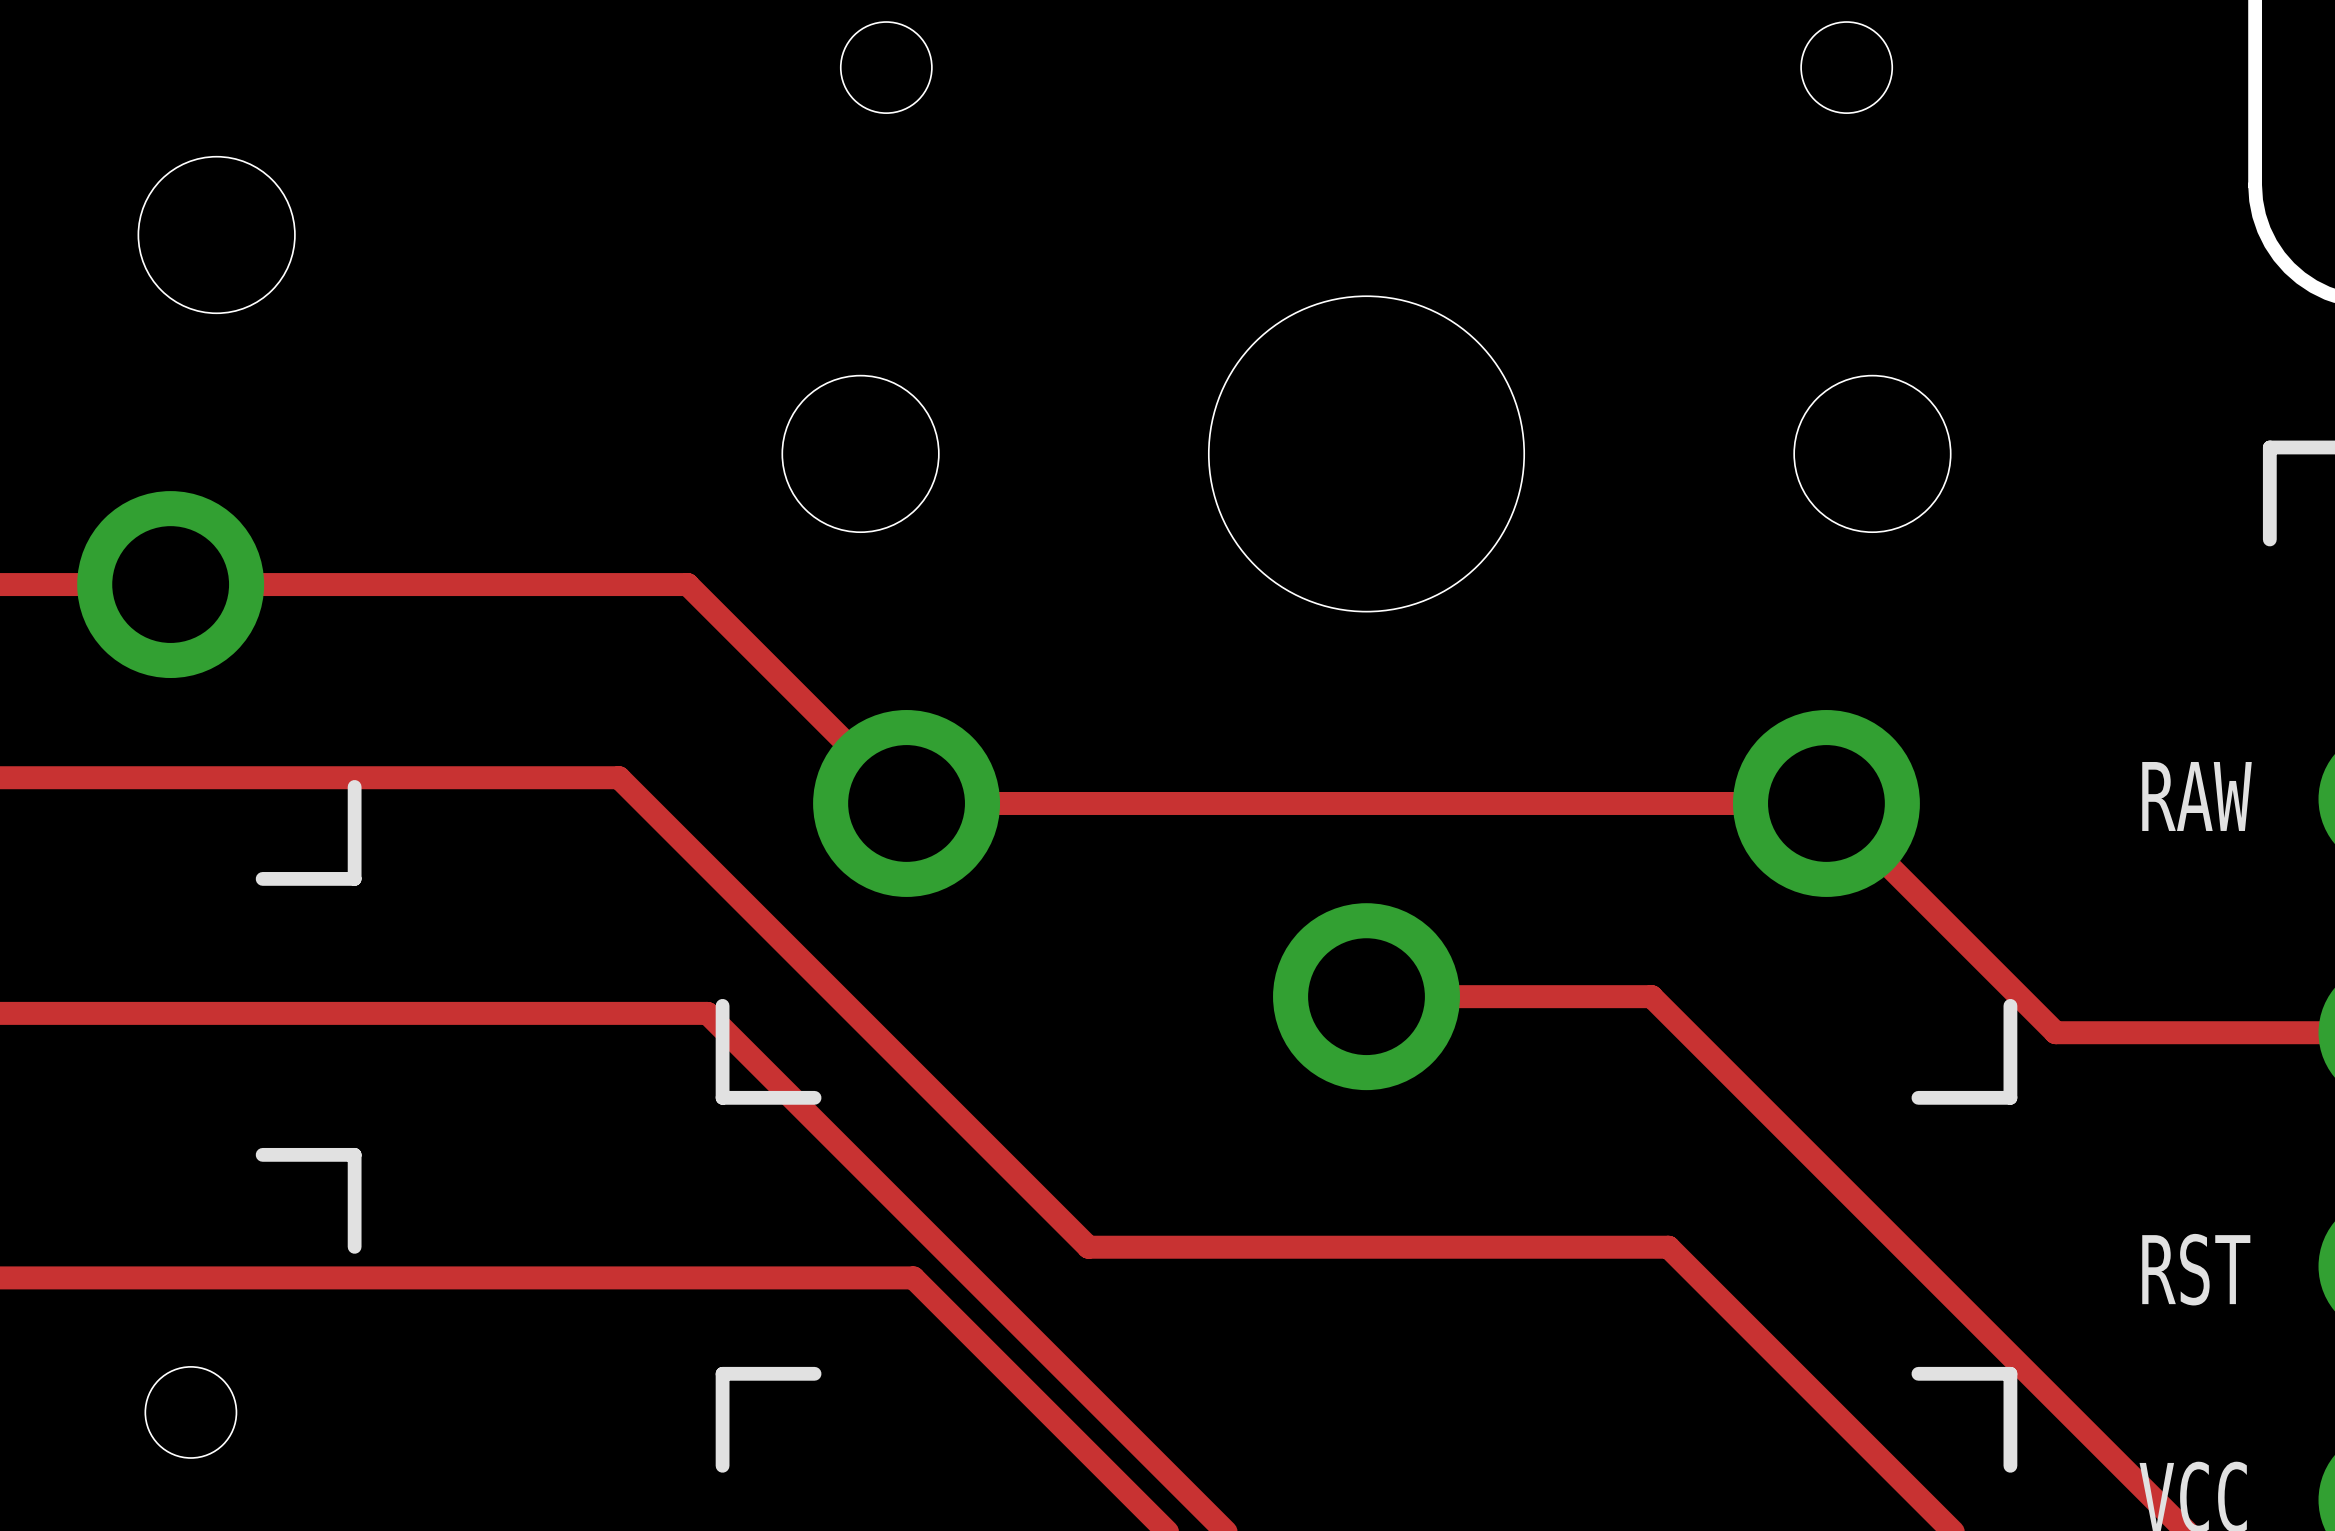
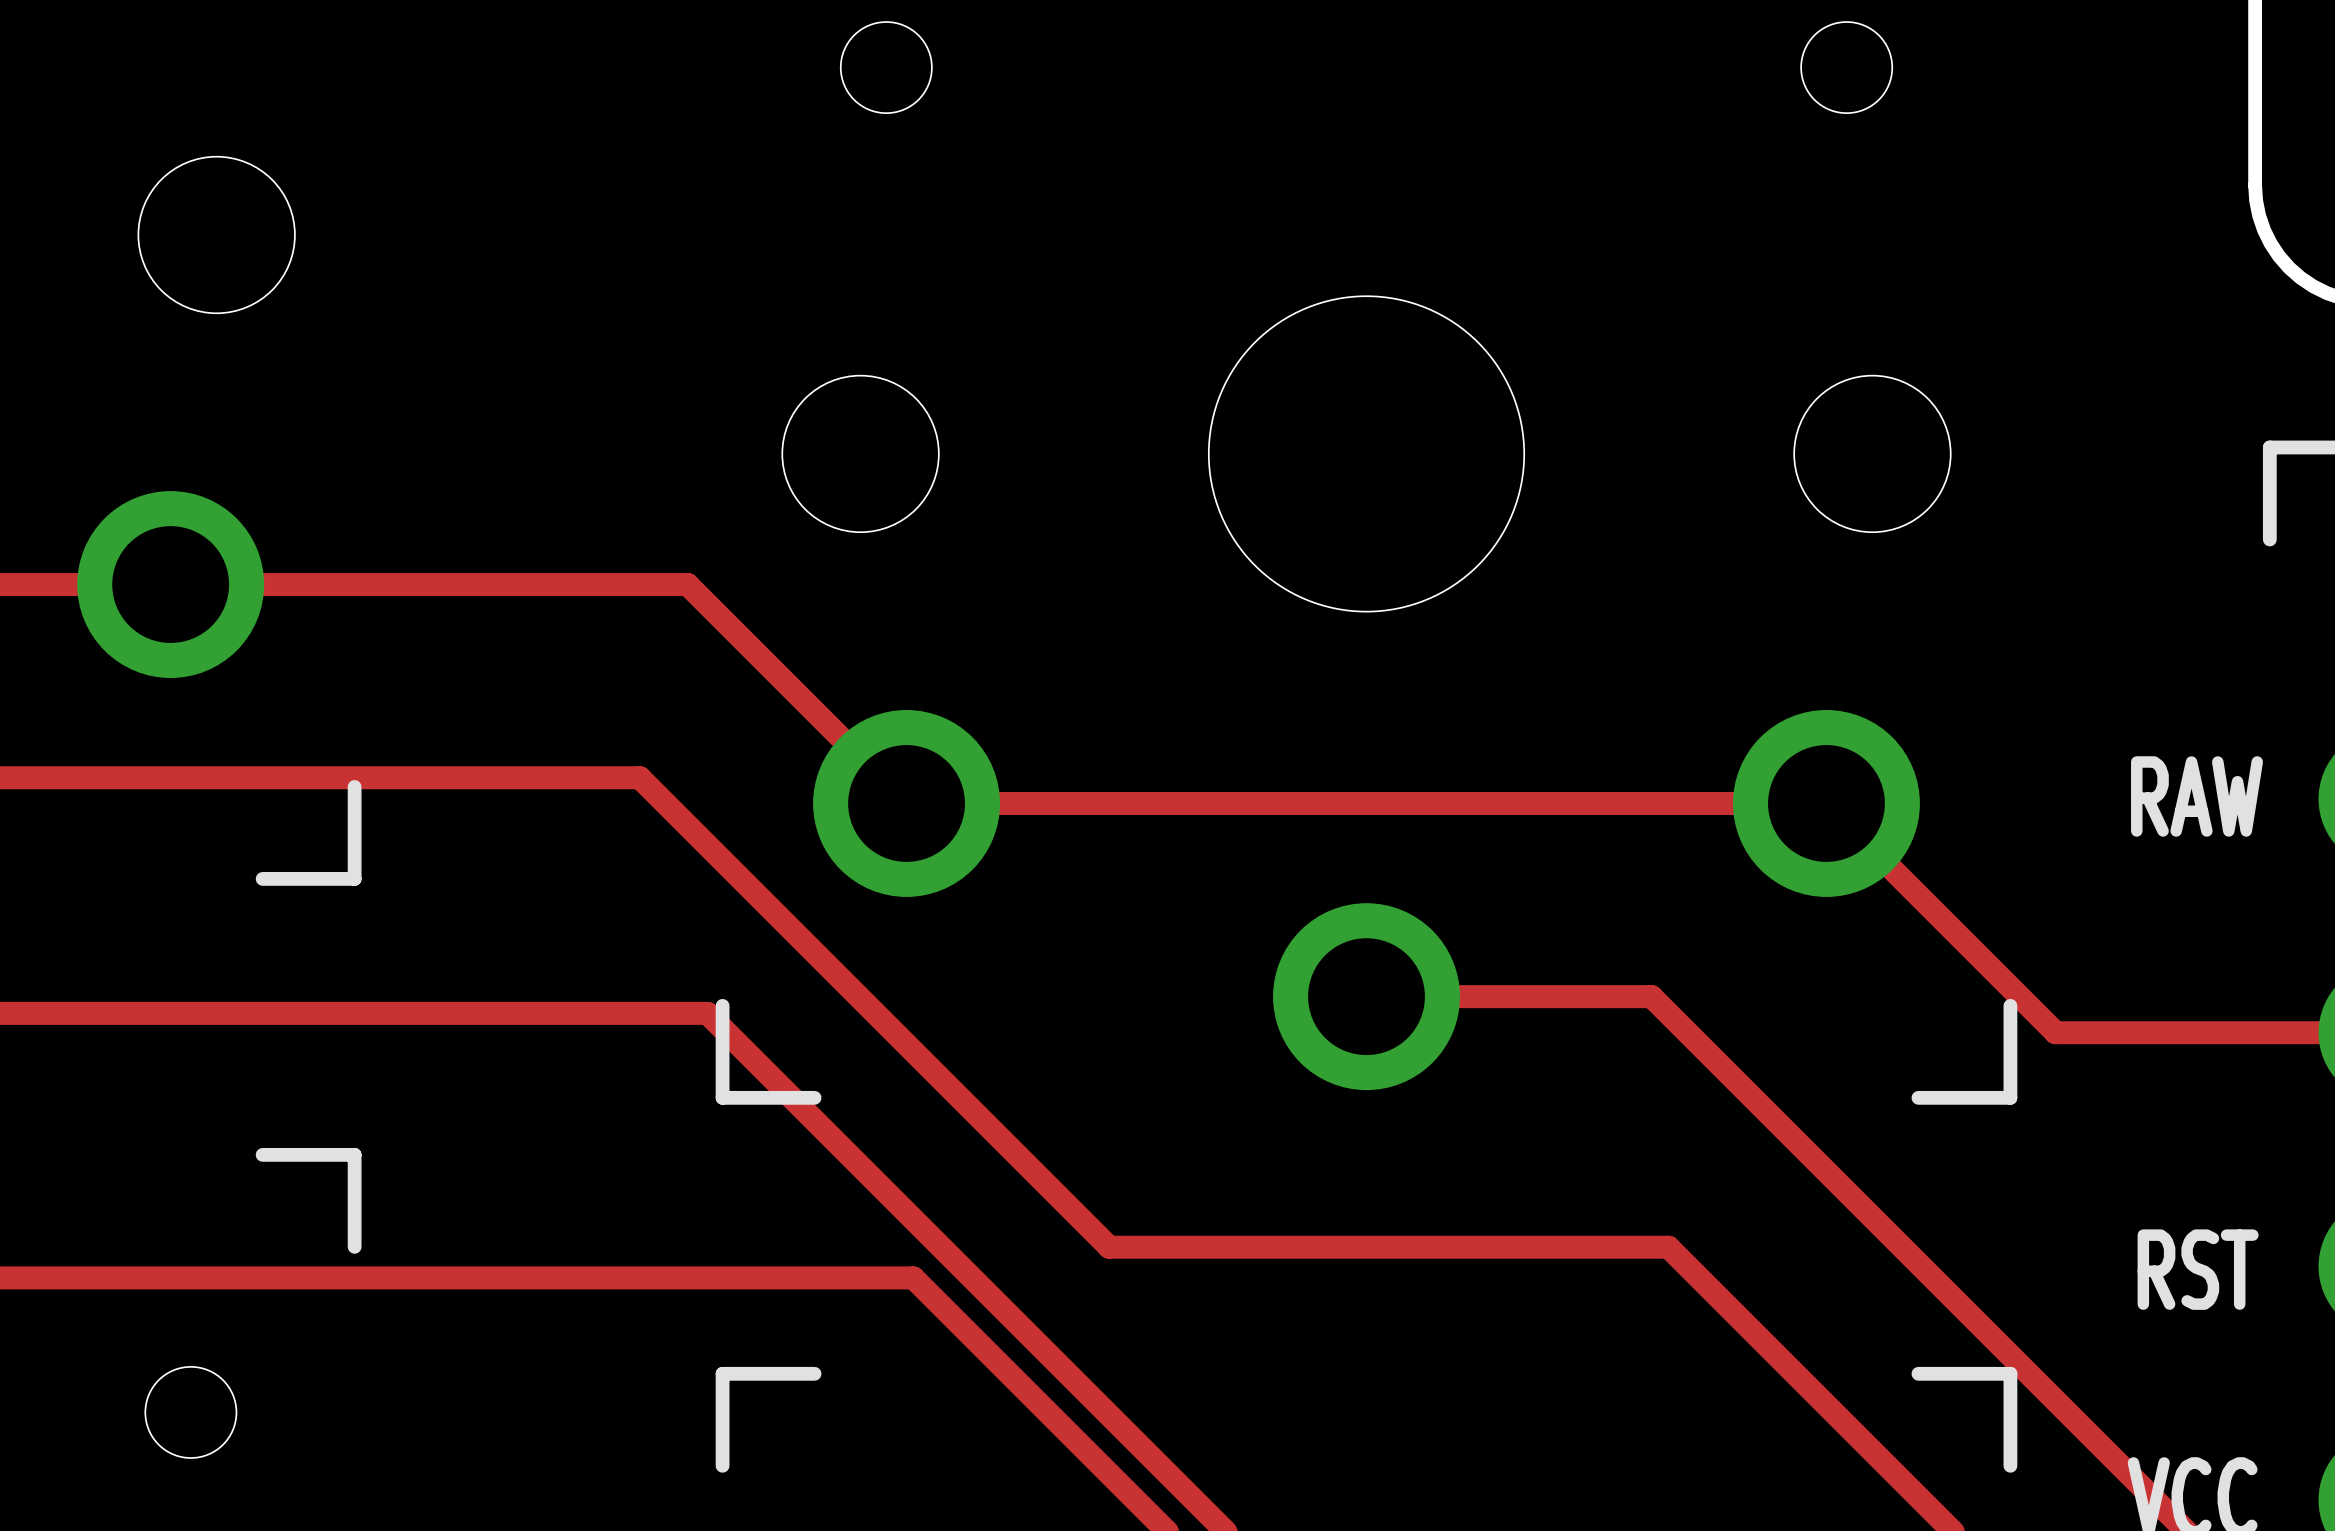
track: (618, 777) (1088, 1247) (1109, 1247) -> (618, 777) (639, 777) (1109, 1247)

